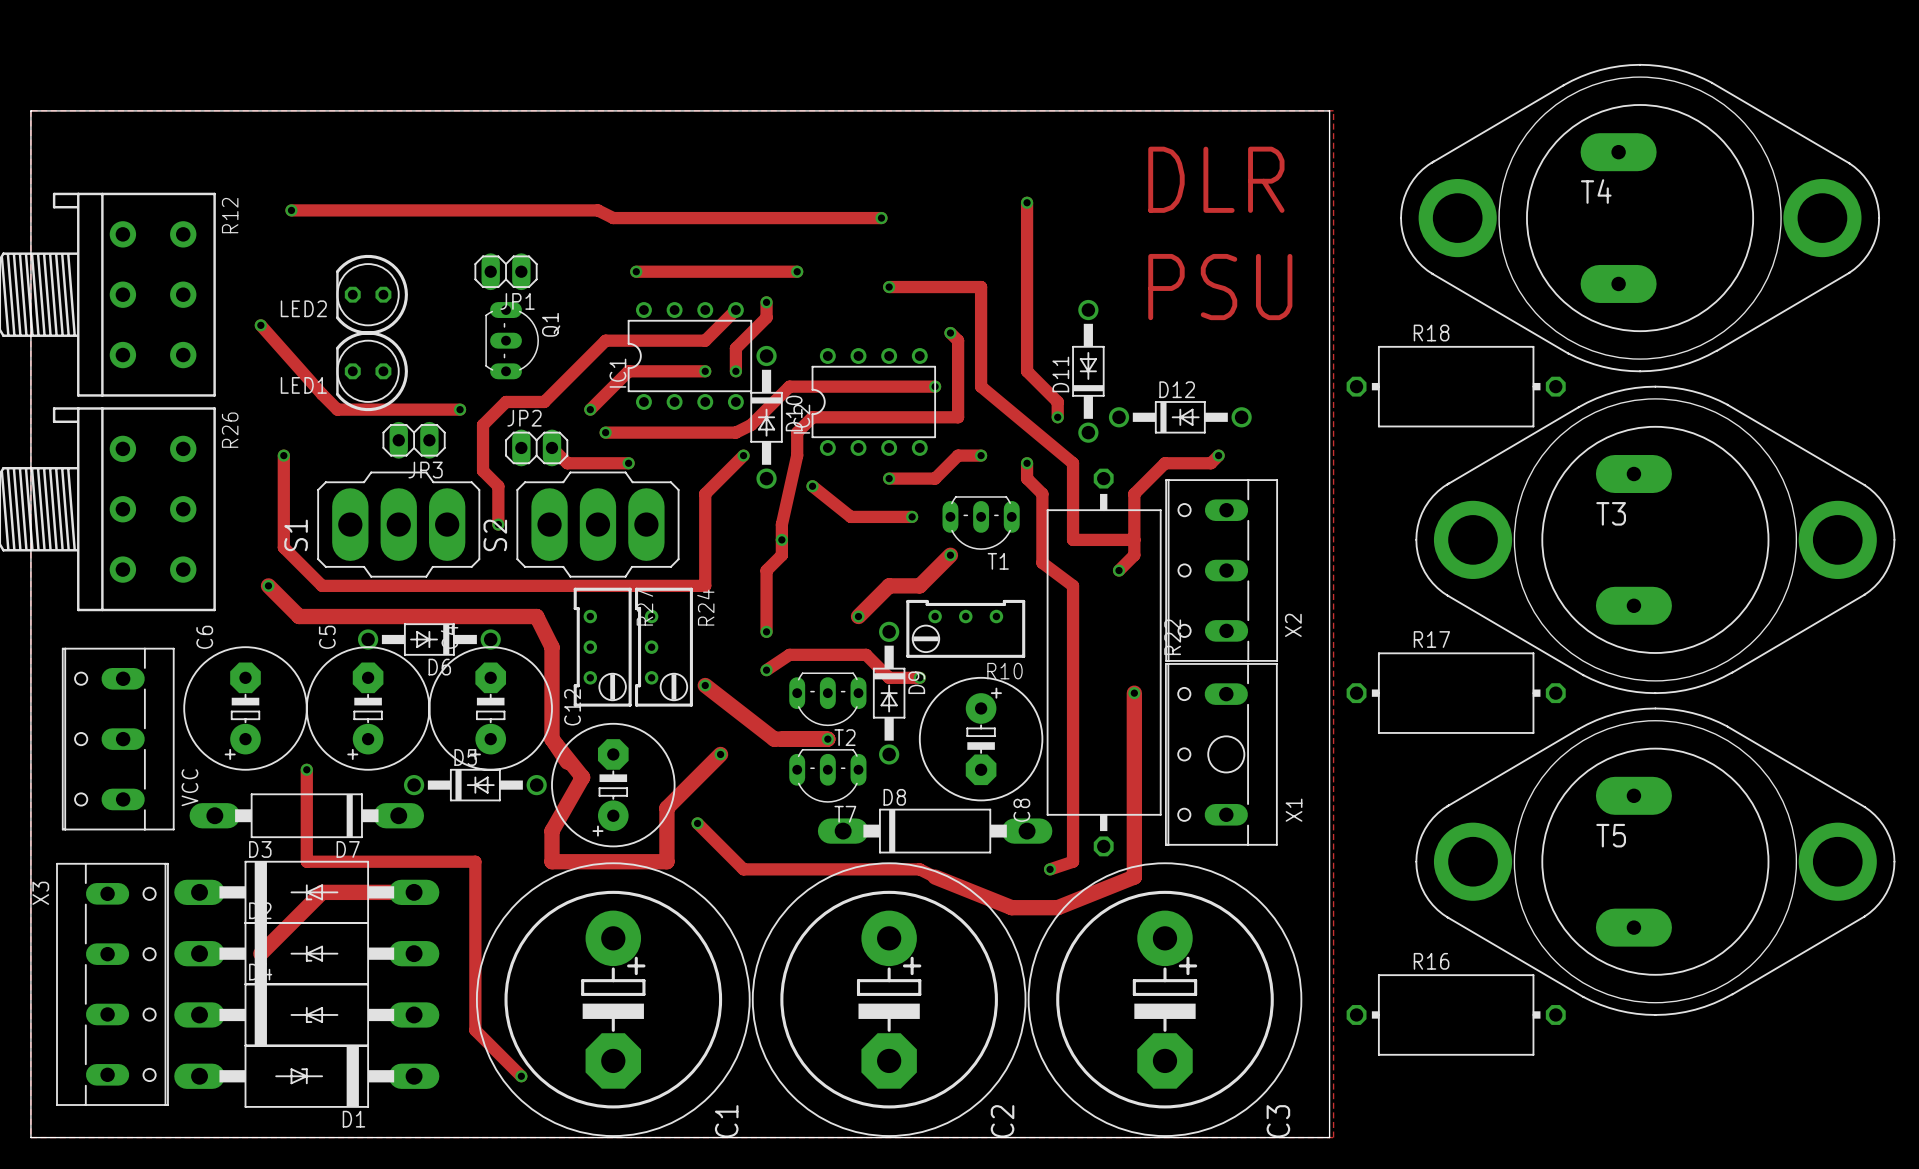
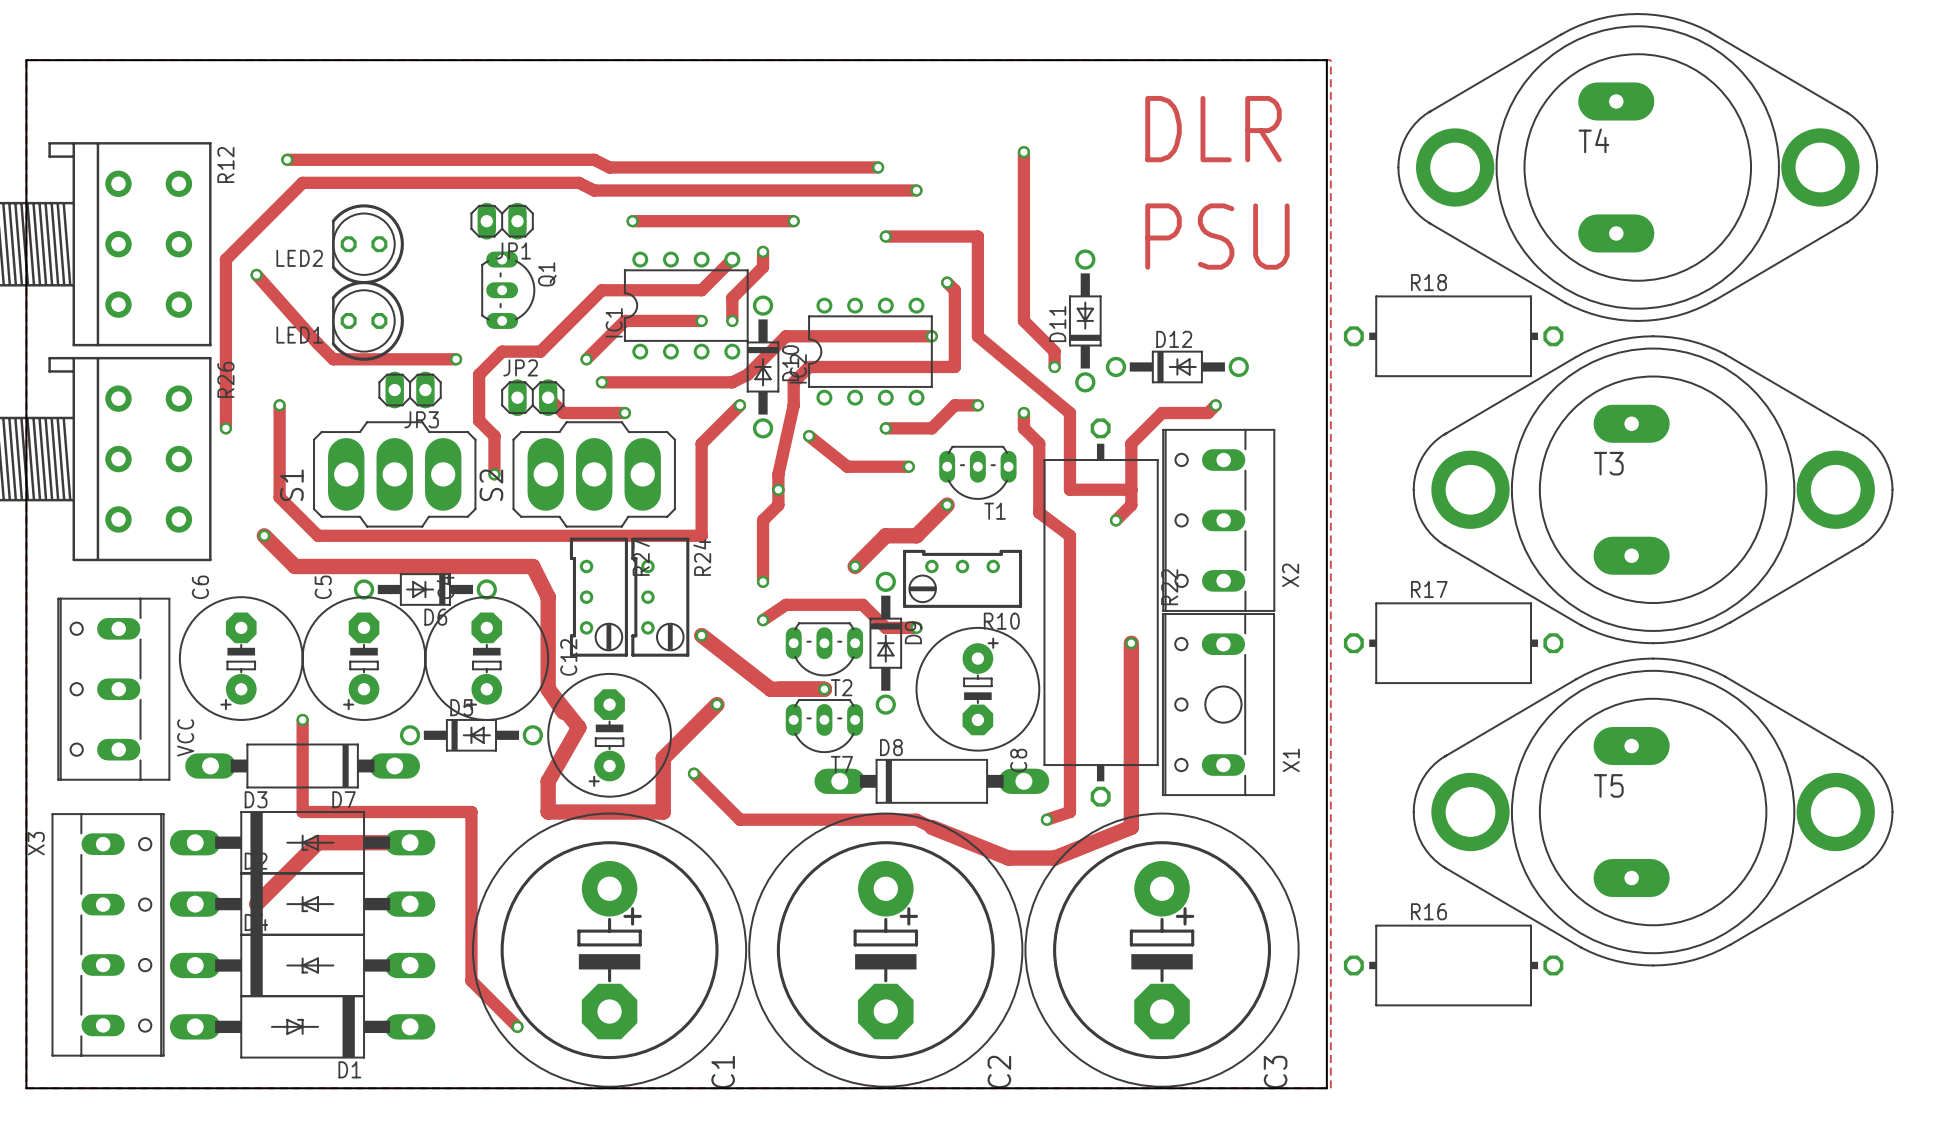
track: none -> (916, 190) (594, 190) (578, 182) (302, 182) (225, 259) (225, 428)
via: none -> (916, 190)
via: none -> (225, 428)

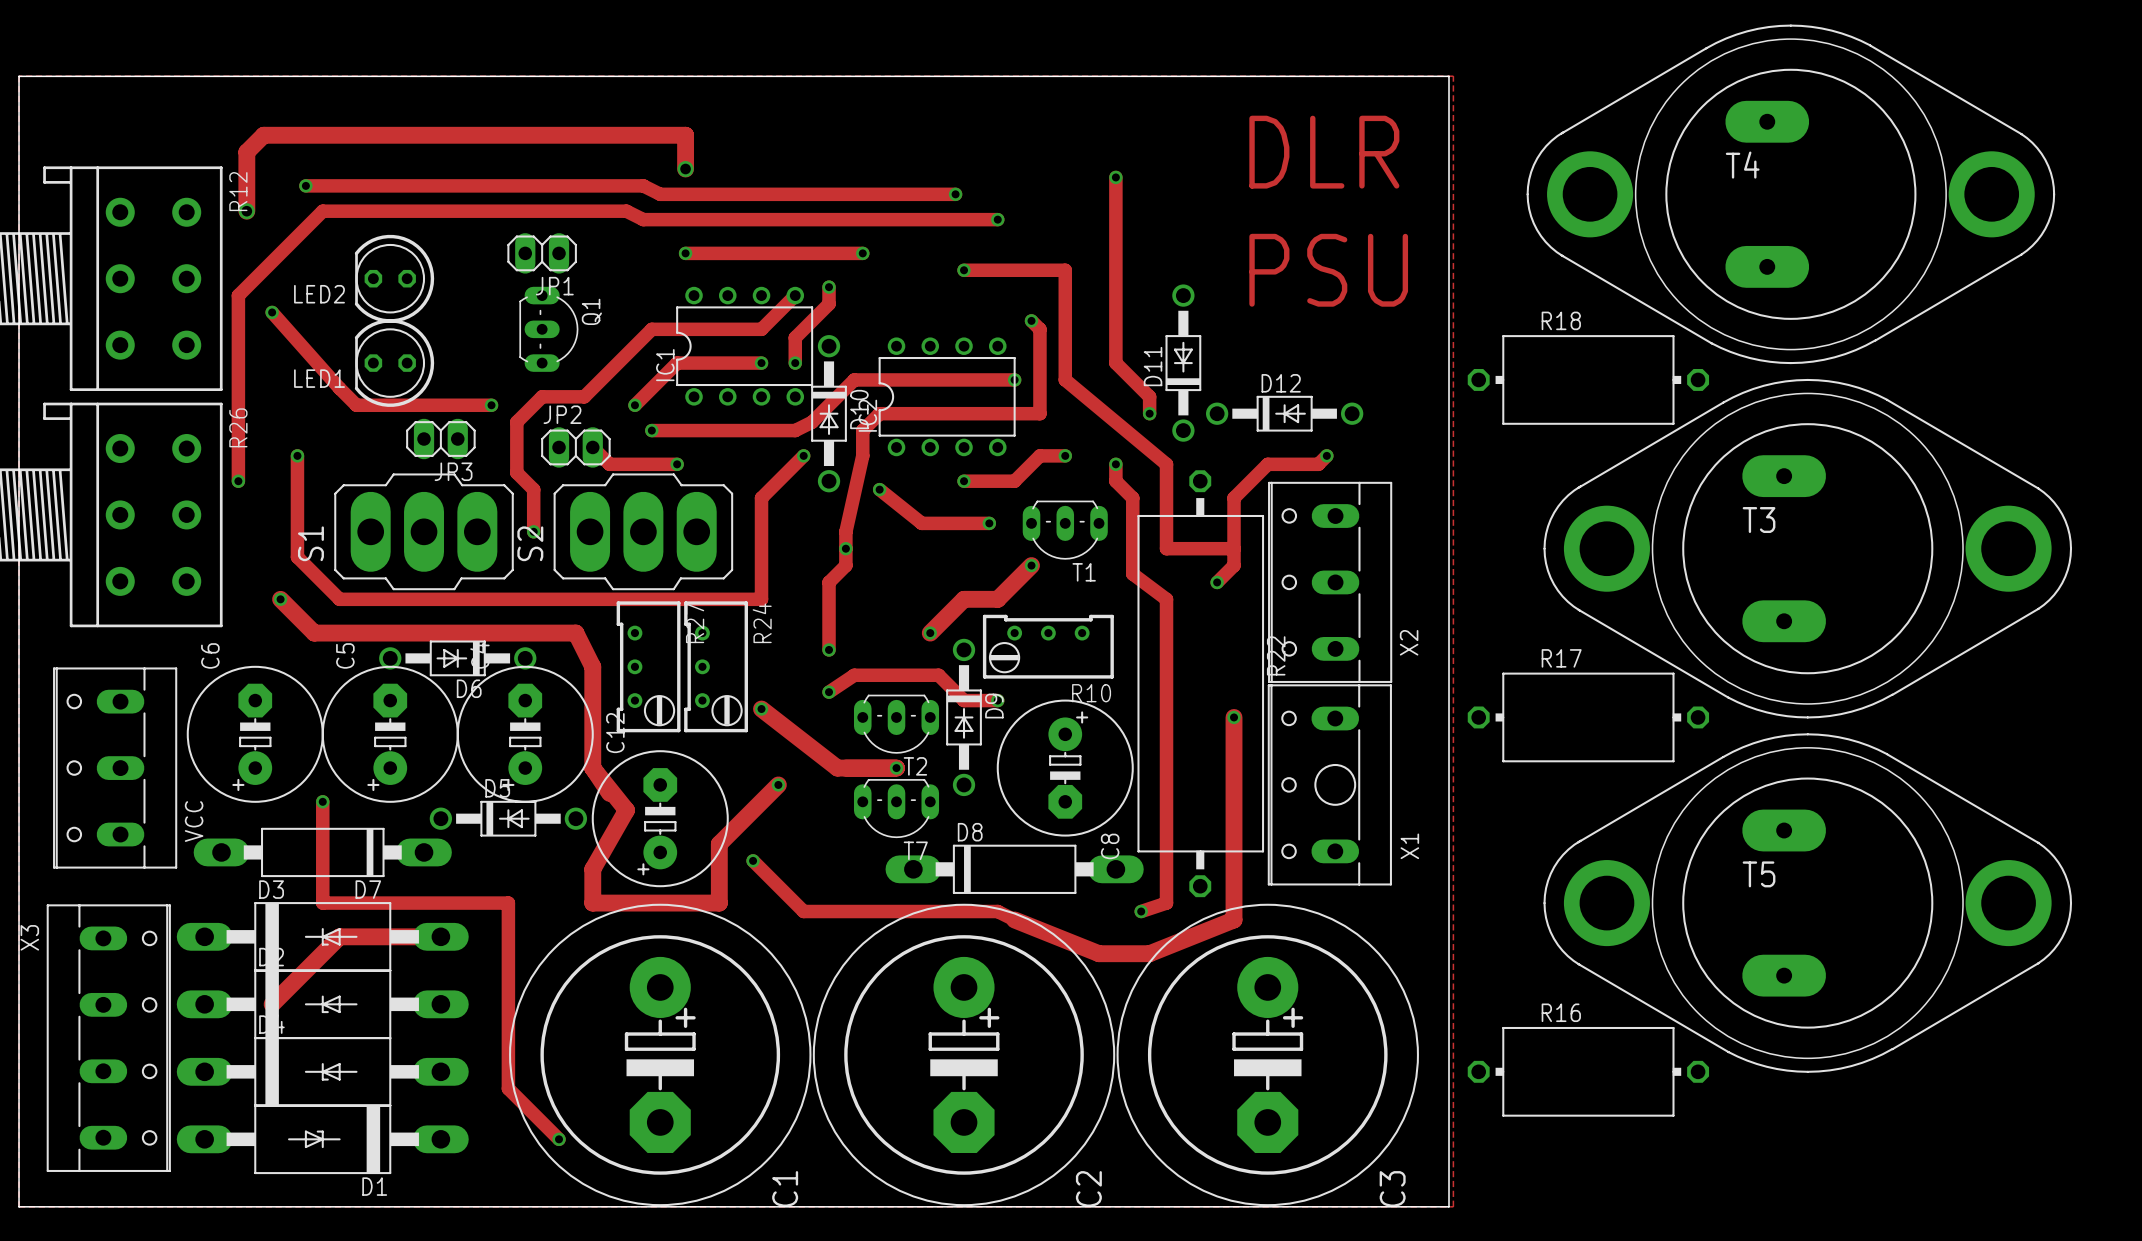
track: none -> (685, 169) (685, 135) (263, 135) (246, 152) (246, 211)
via: none -> (685, 169)
via: none -> (246, 211)

